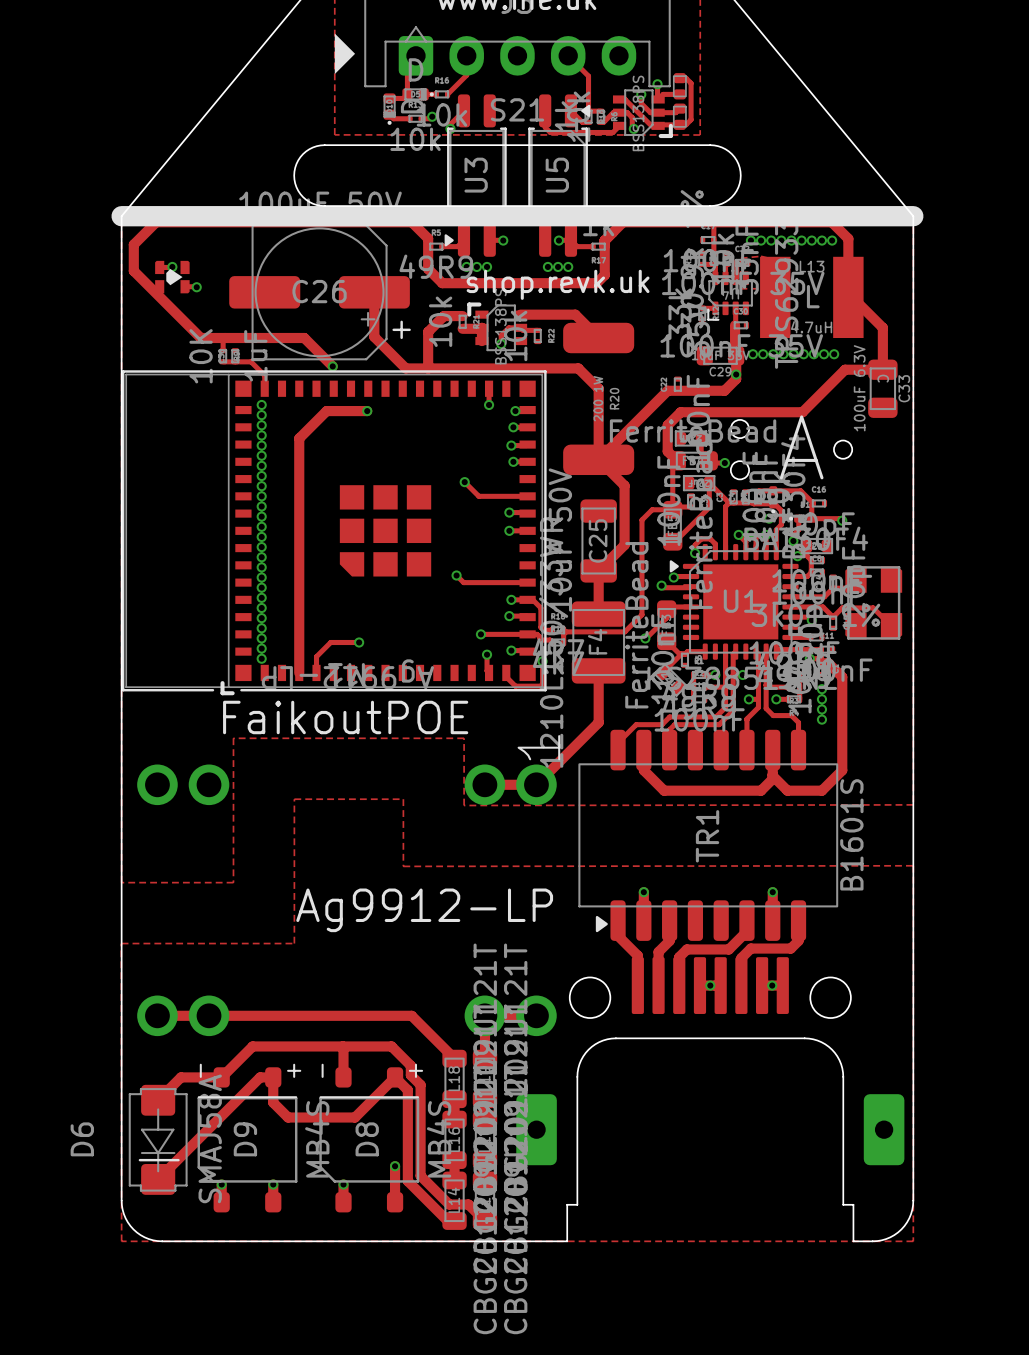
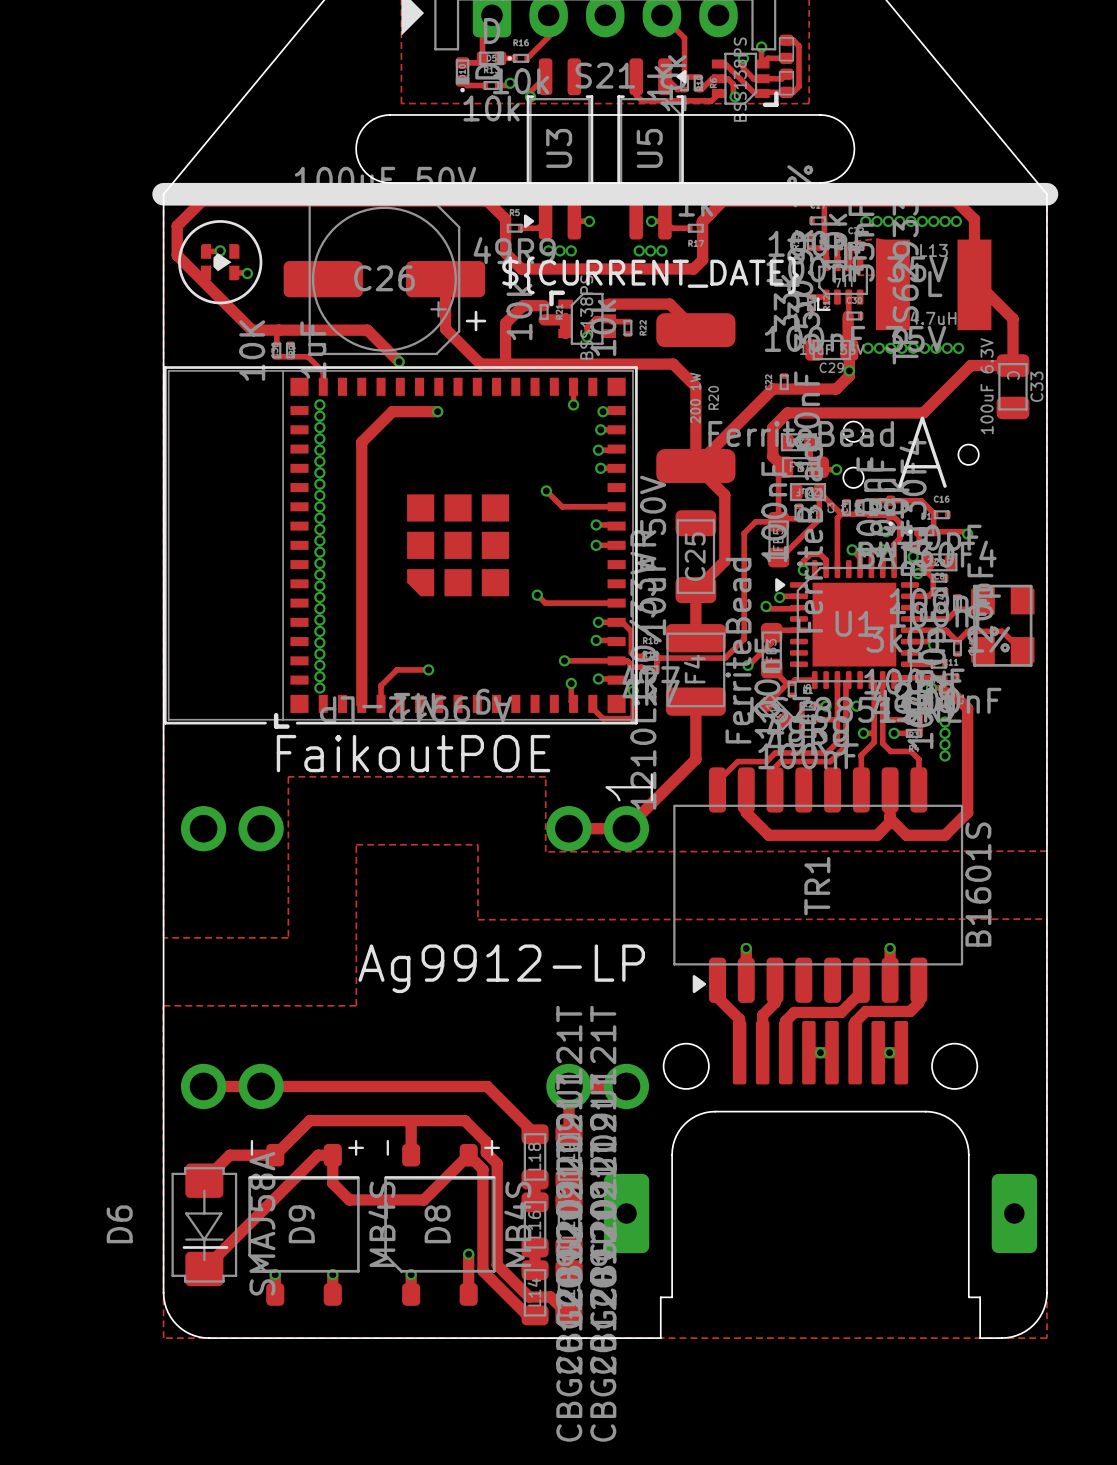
drawing: none -> [178, 220, 263, 305]
text: shop.revk.uk (558, 284) -> ${CURRENT_DATE} (650, 275)

